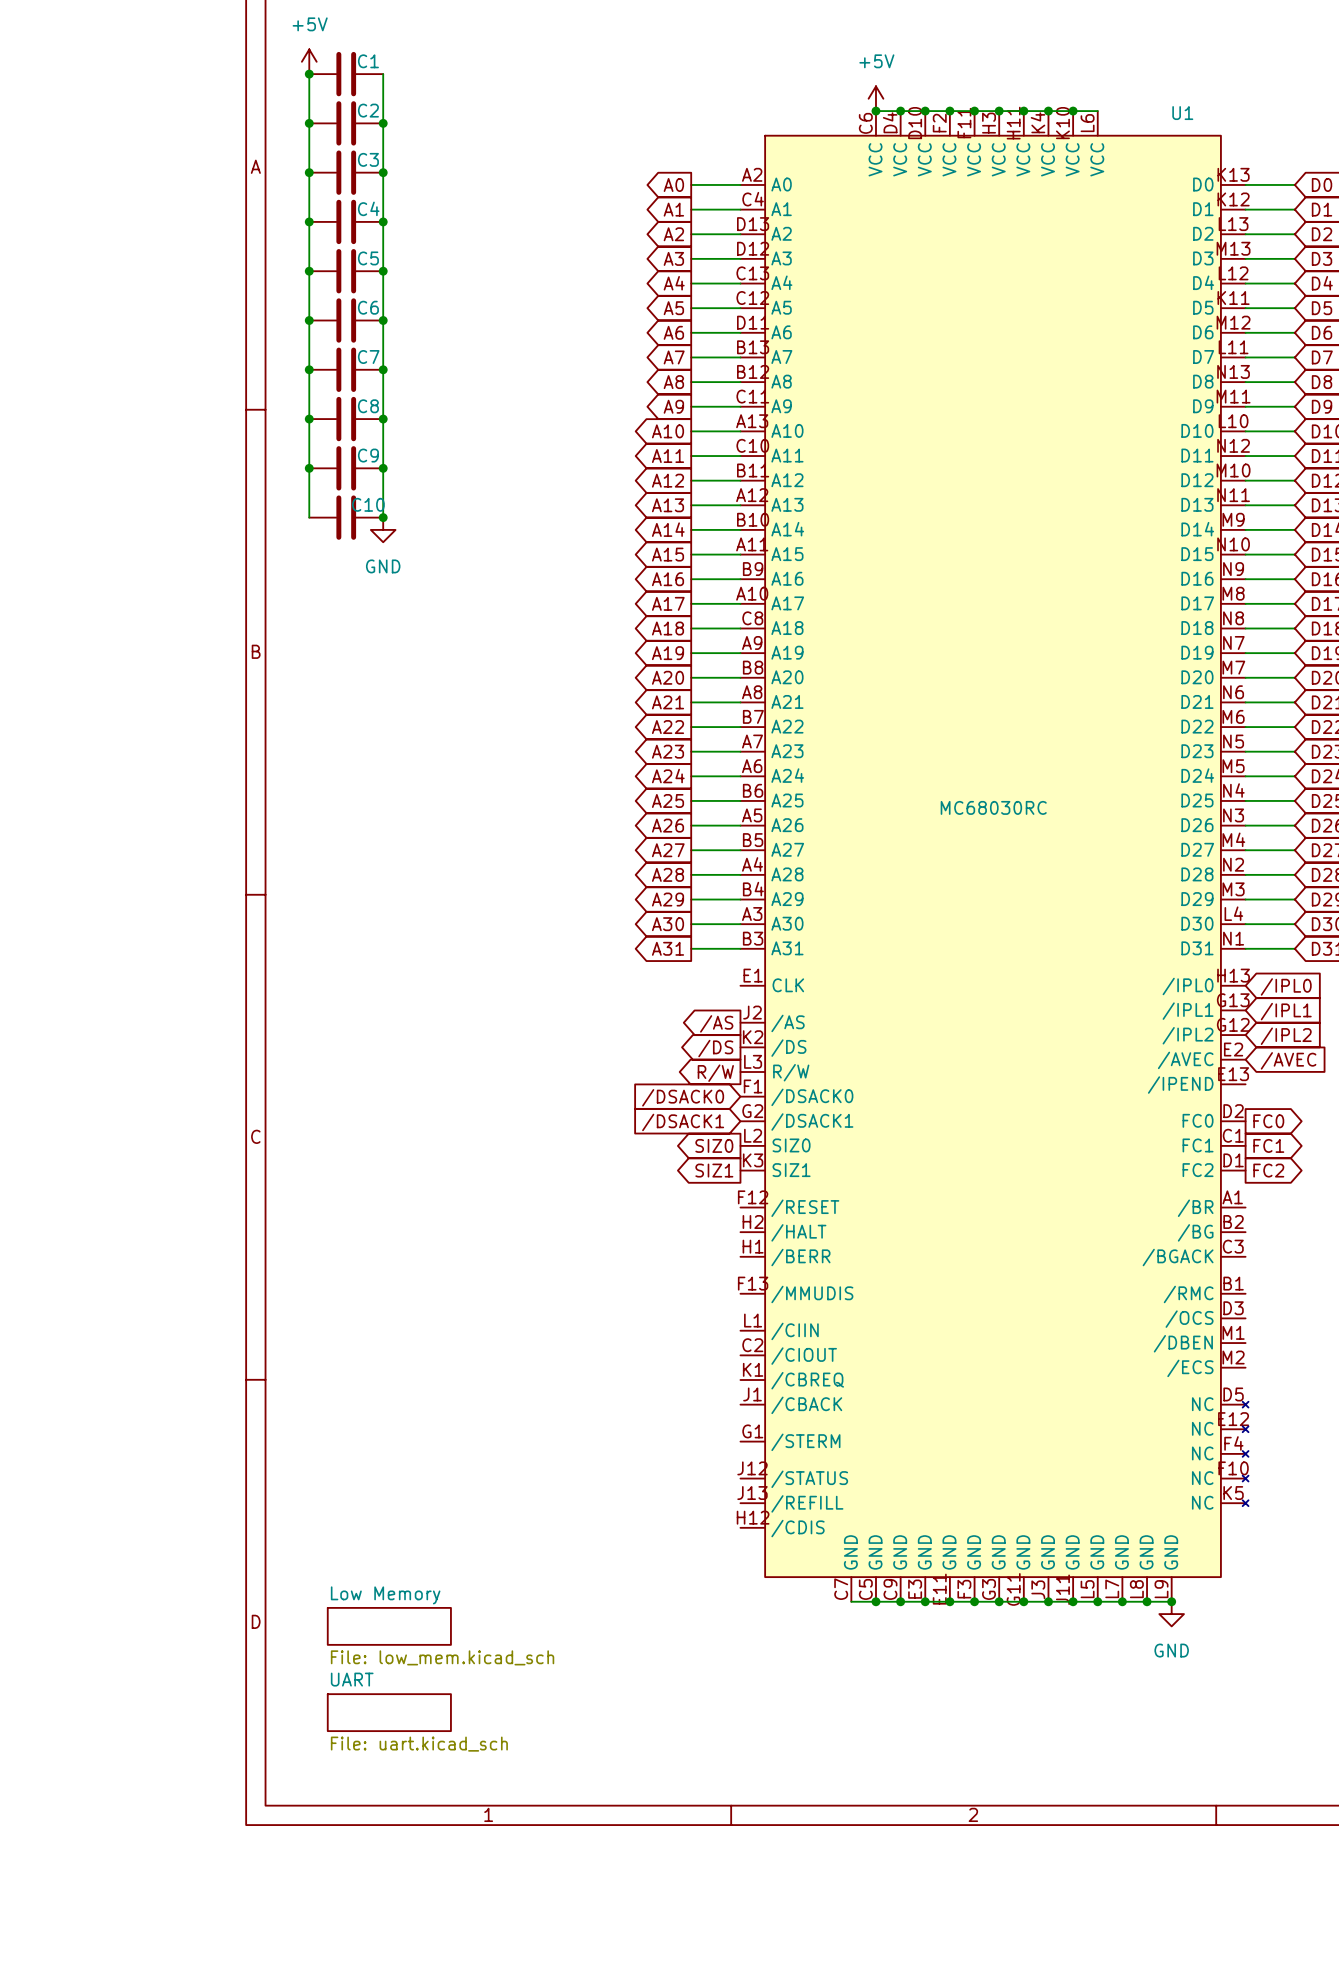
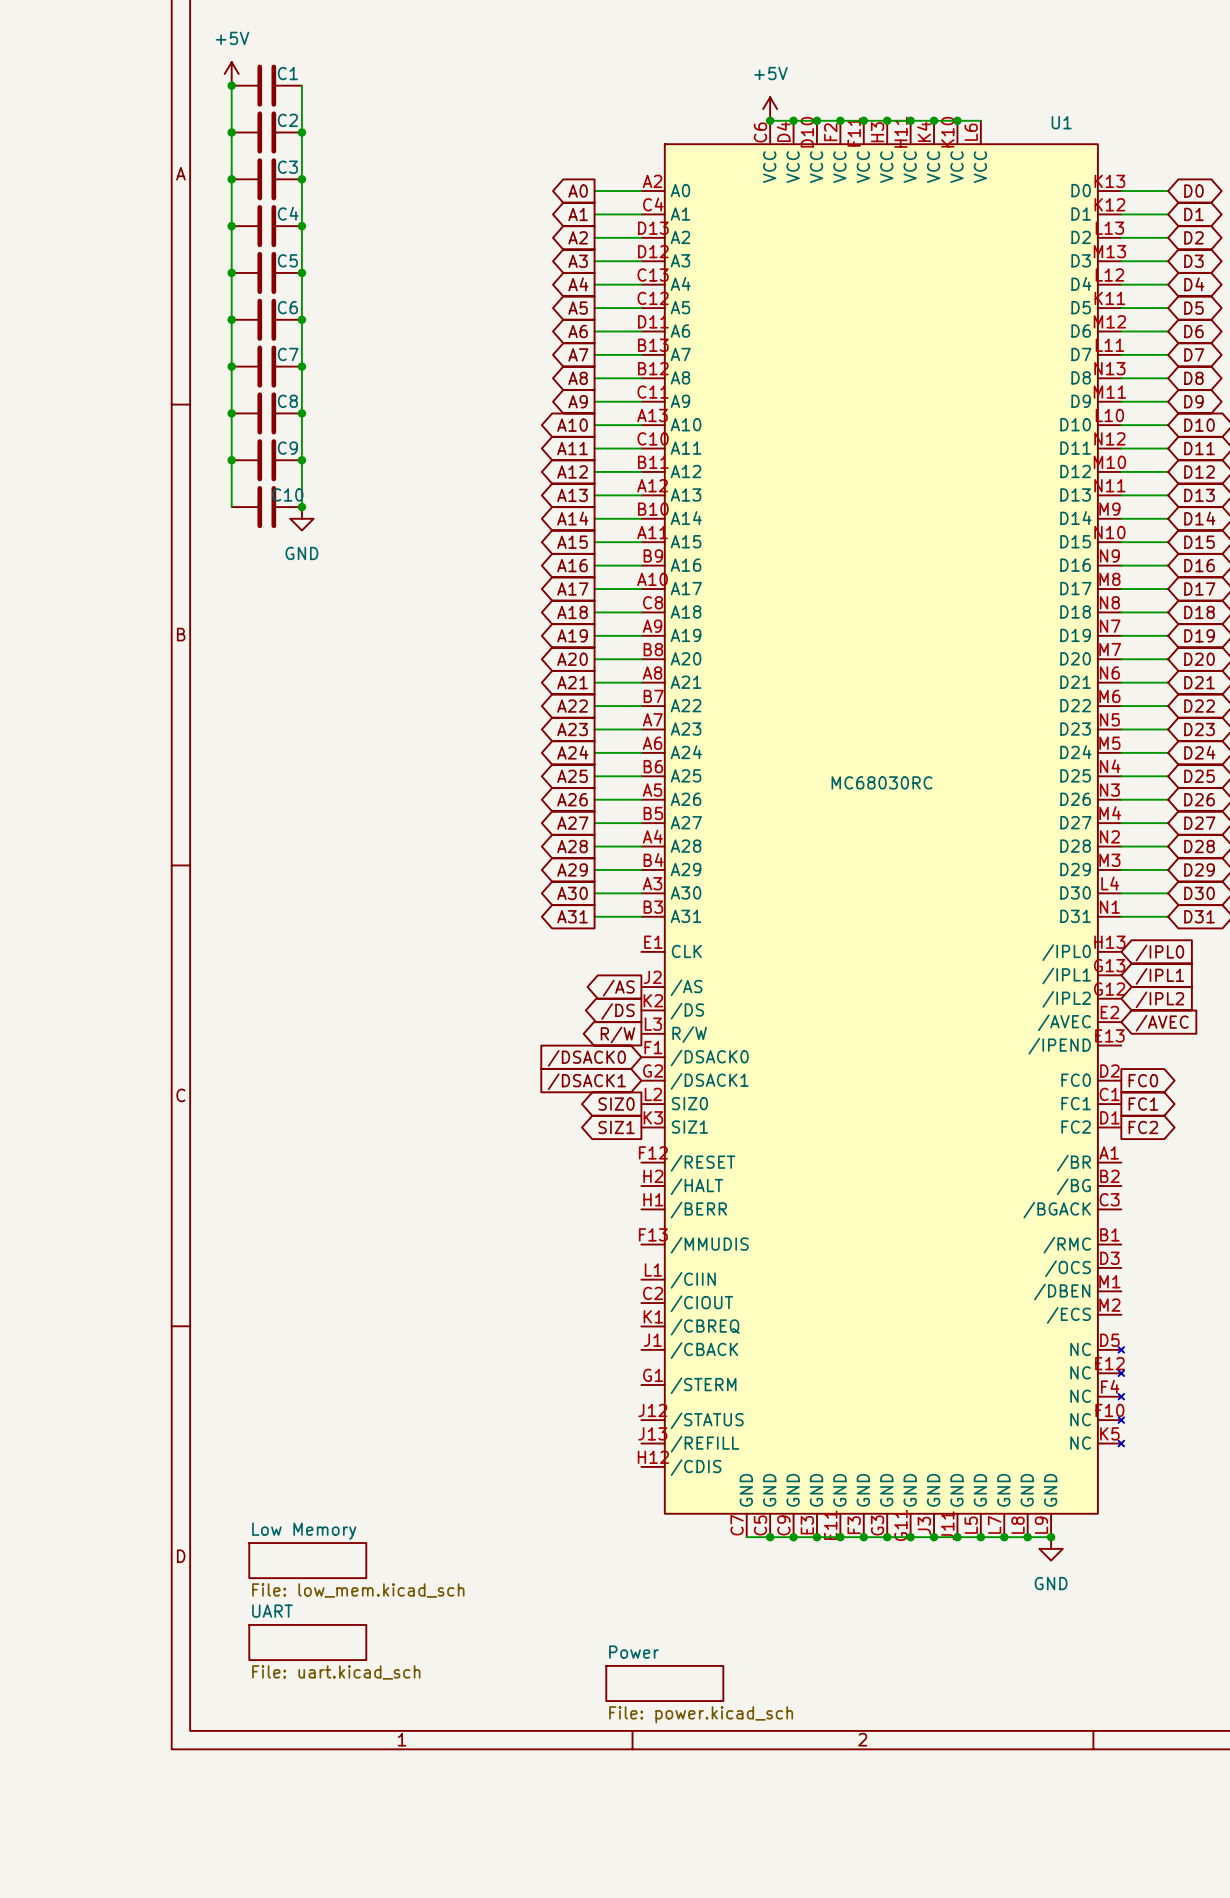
sheet Power: none -> File: power.kicad_sch (664, 1683)

